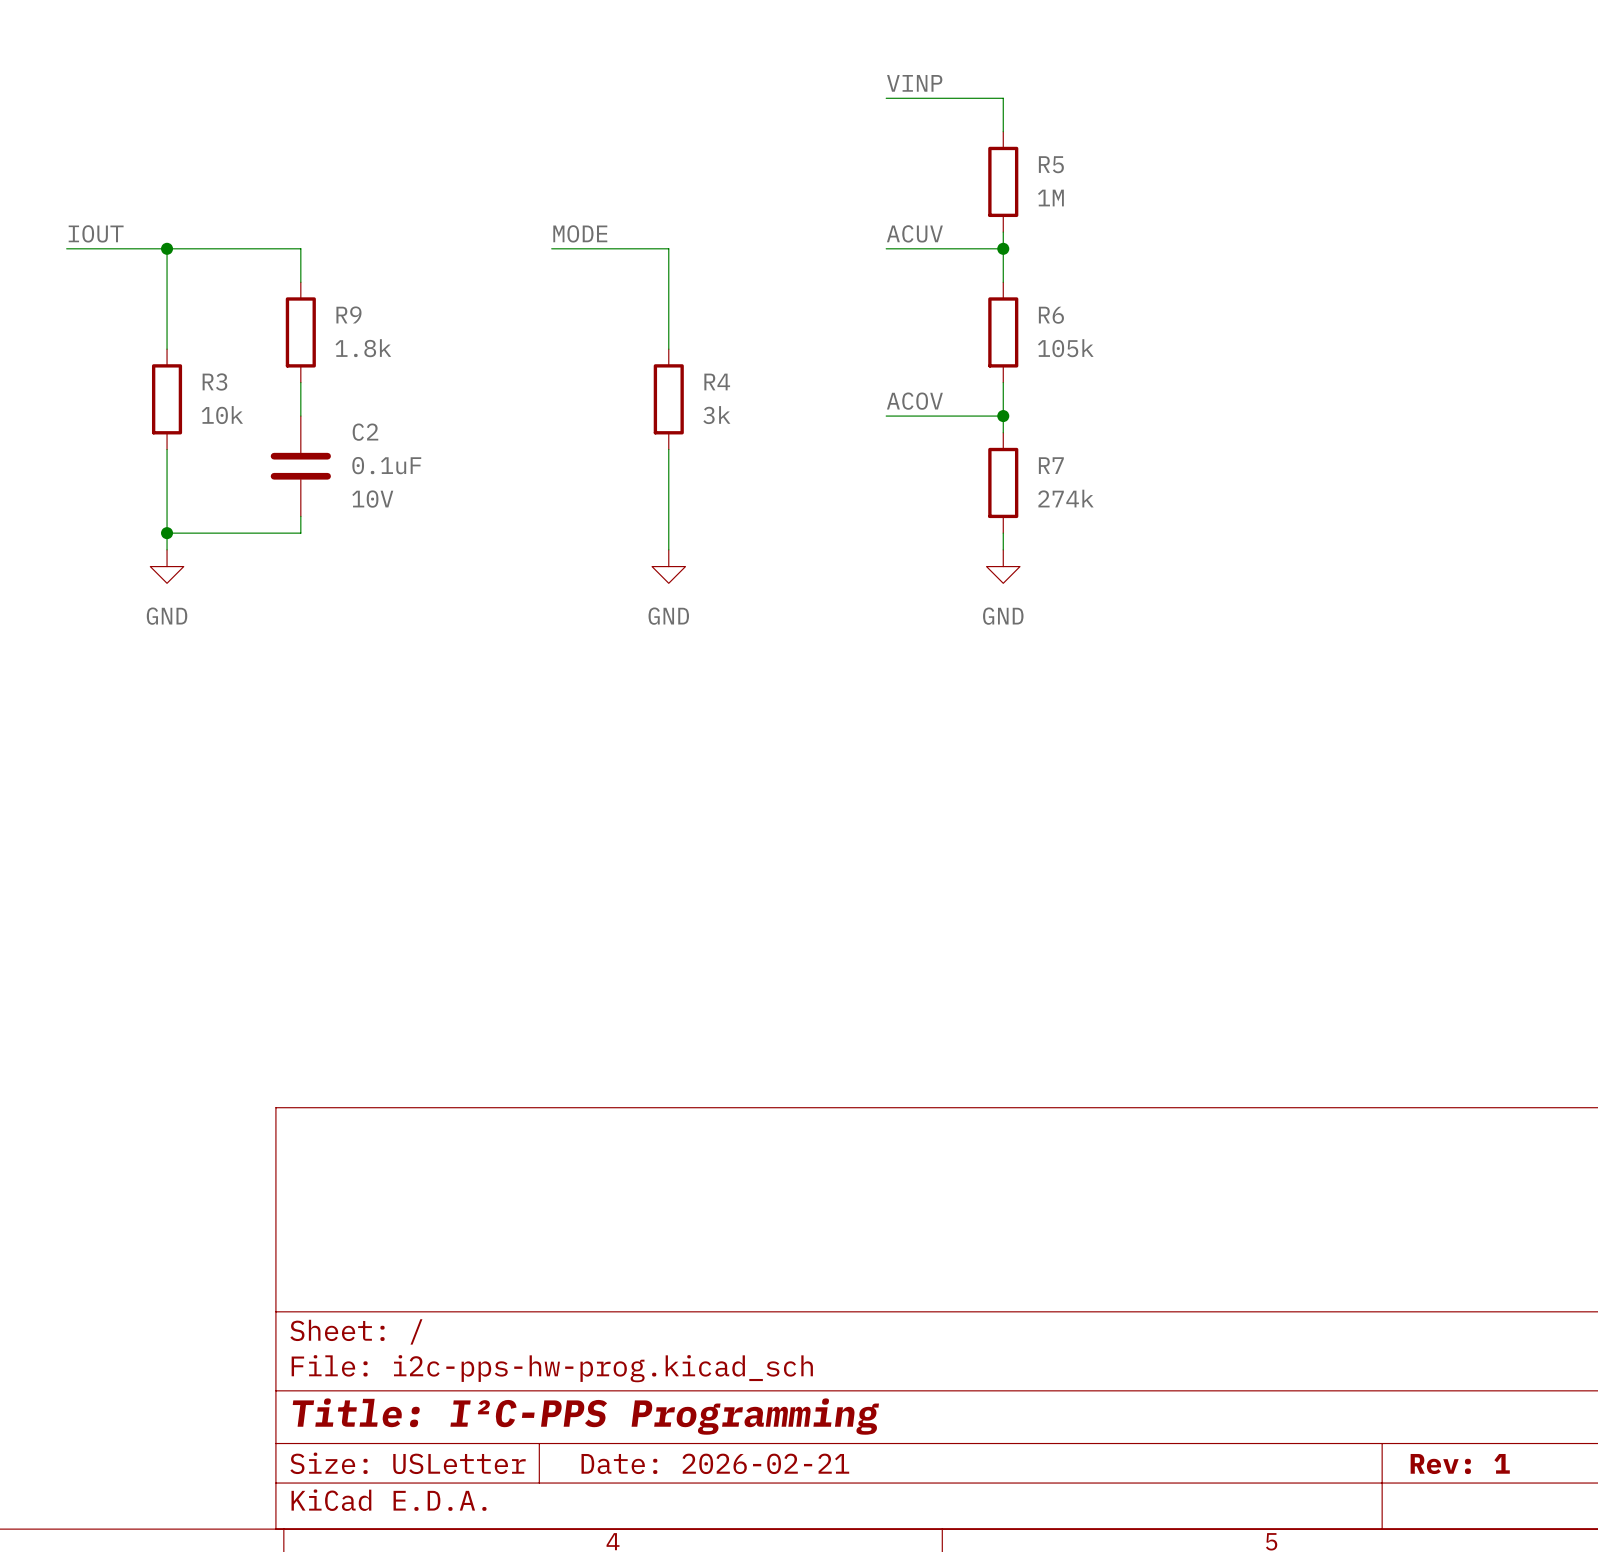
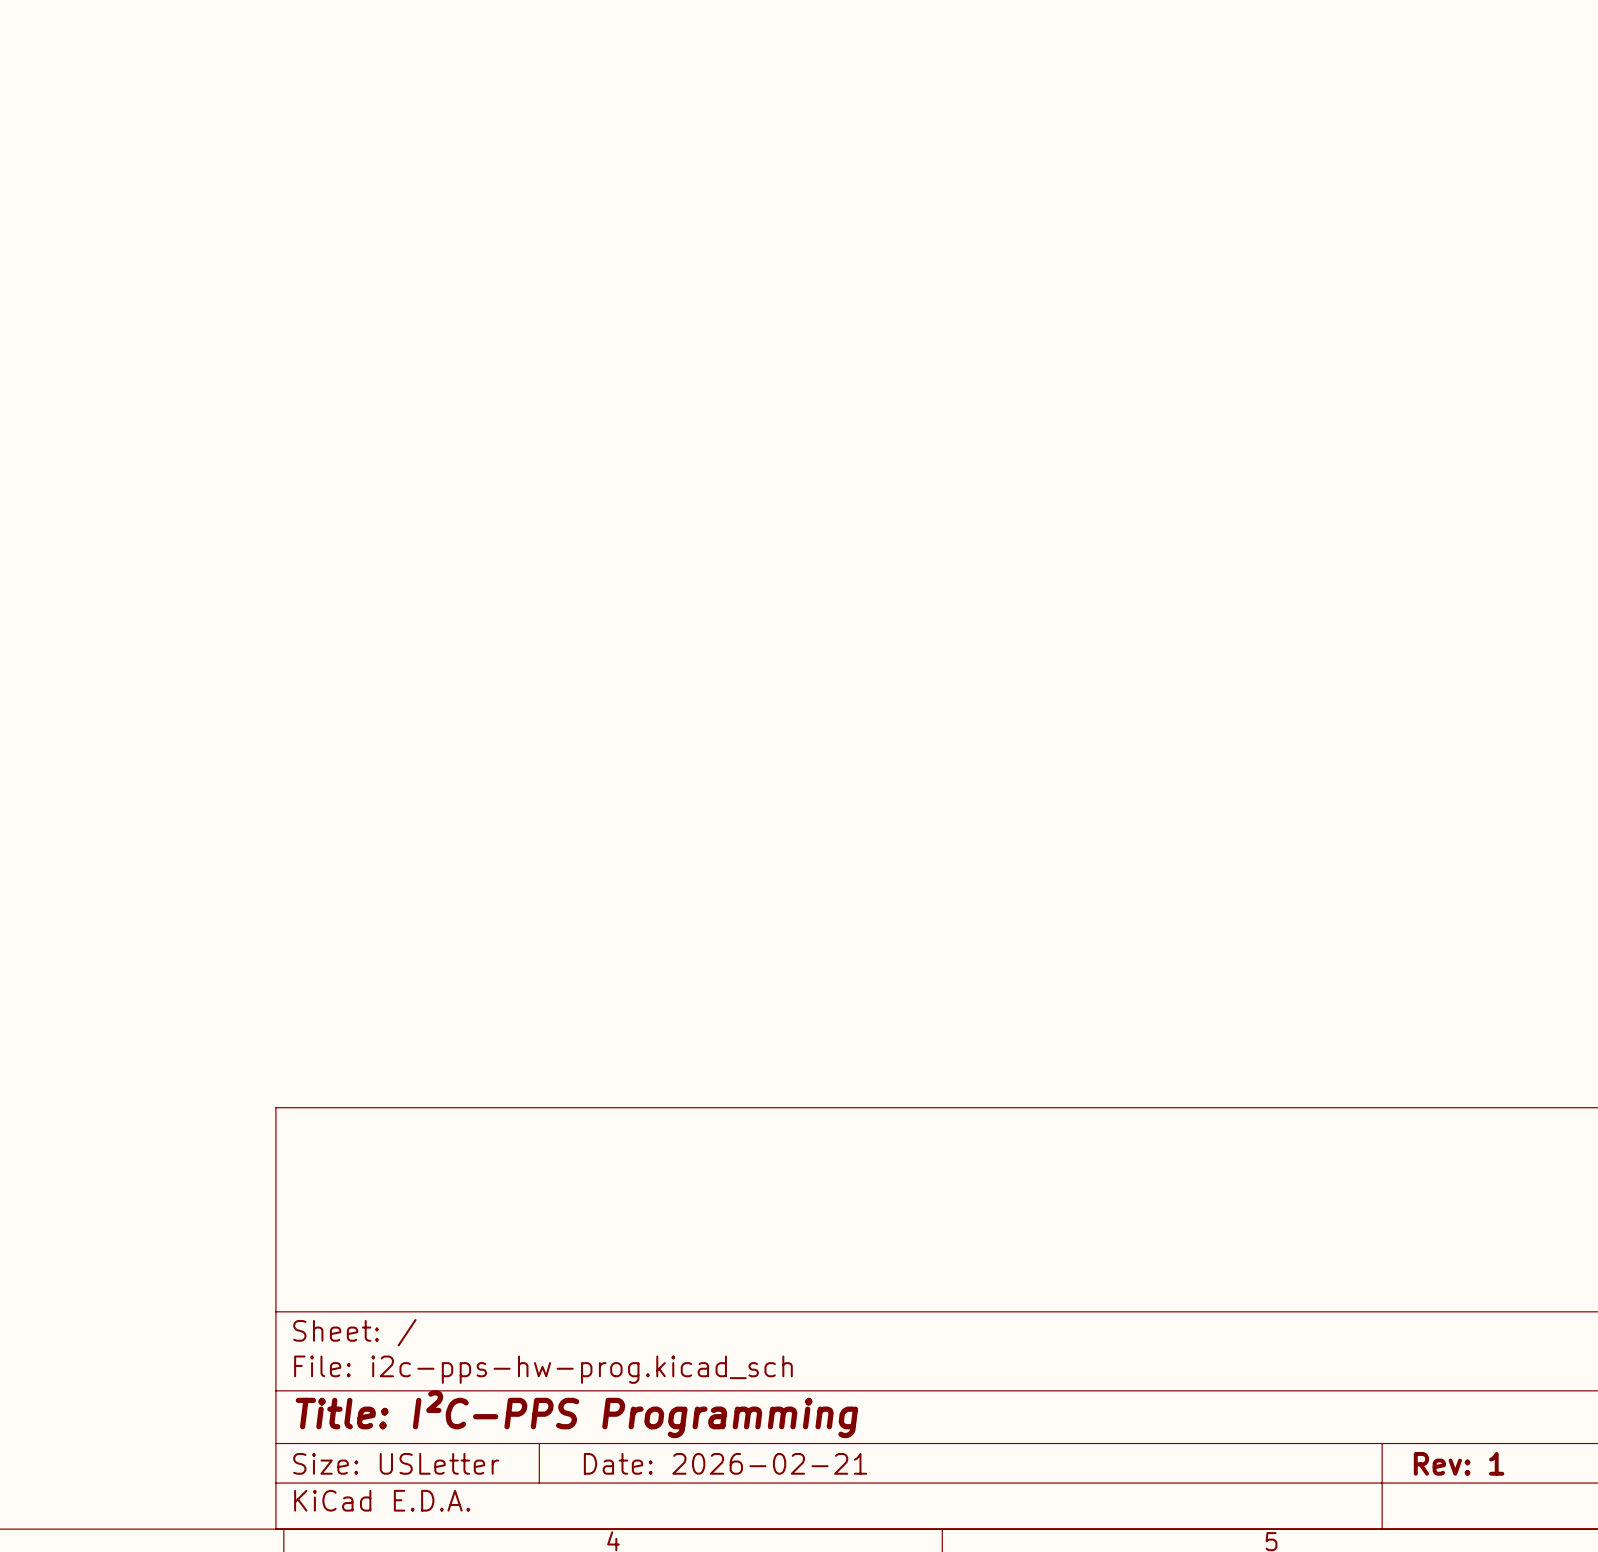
label: VINP (914, 83) -> none
wire: (886, 98) (1003, 98) (1003, 131) -> none
R5: 1M (1003, 181) -> none
wire: (1003, 232) (1003, 282) -> none
label: IOUT (96, 233) -> none
label: MODE (580, 233) -> none
label: ACUV (914, 233) -> none
wire: (66, 248) (300, 248) (300, 282) -> none
wire: (167, 248) (167, 349) -> none
junction: (167, 248) -> none
wire: (551, 248) (668, 248) (668, 349) -> none
wire: (886, 248) (1003, 248) -> none
junction: (1003, 248) -> none
R9: 1.8k (300, 332) -> none
R6: 105k (1003, 332) -> none
wire: (300, 382) (300, 416) -> none
wire: (1003, 382) (1003, 432) -> none
R3: 10k (167, 399) -> none
R4: 3k (668, 399) -> none
label: ACOV (914, 401) -> none
wire: (886, 416) (1003, 416) -> none
junction: (1003, 416) -> none
wire: (167, 449) (167, 549) -> none
wire: (668, 449) (668, 549) -> none
C2: 0.1uF (300, 466) -> none
R7: 274k (1003, 482) -> none
wire: (300, 516) (300, 533) (167, 533) -> none
junction: (167, 533) -> none
wire: (1003, 533) (1003, 549) -> none
power symbol: GND (167, 566) -> none
power symbol: GND (668, 566) -> none
power symbol: GND (1003, 566) -> none

